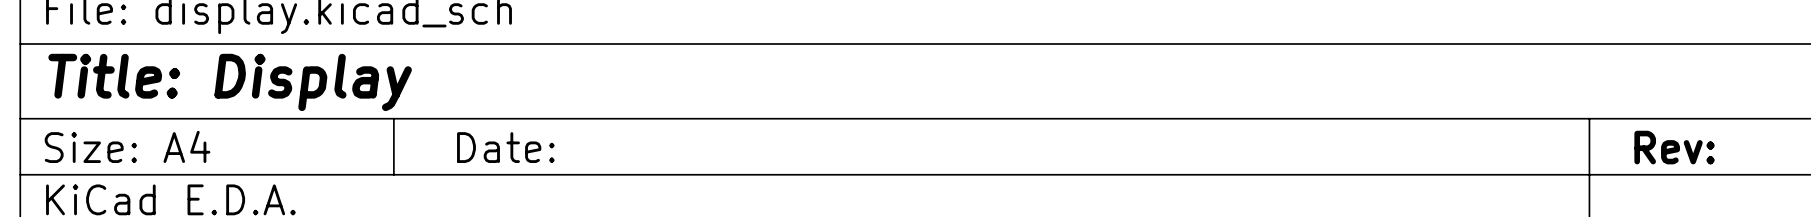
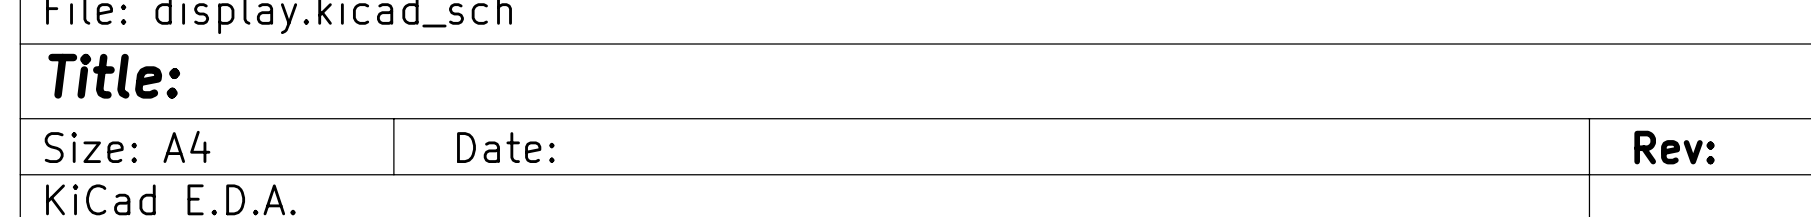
title block: Title: Display (230, 82) -> Title: (114, 76)

